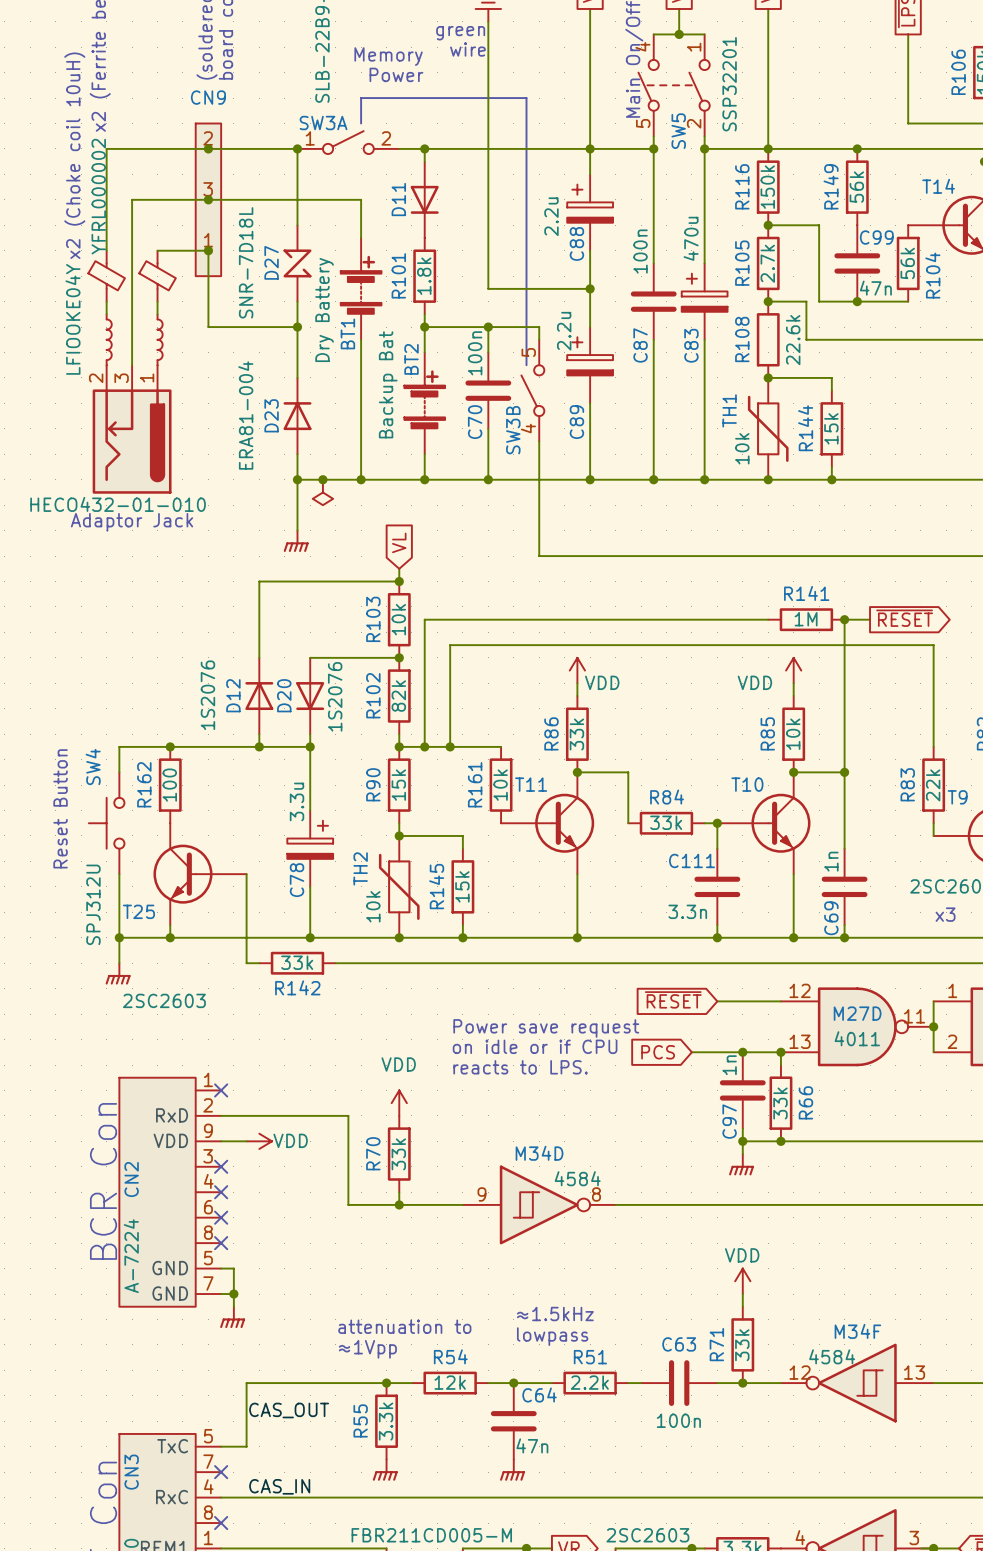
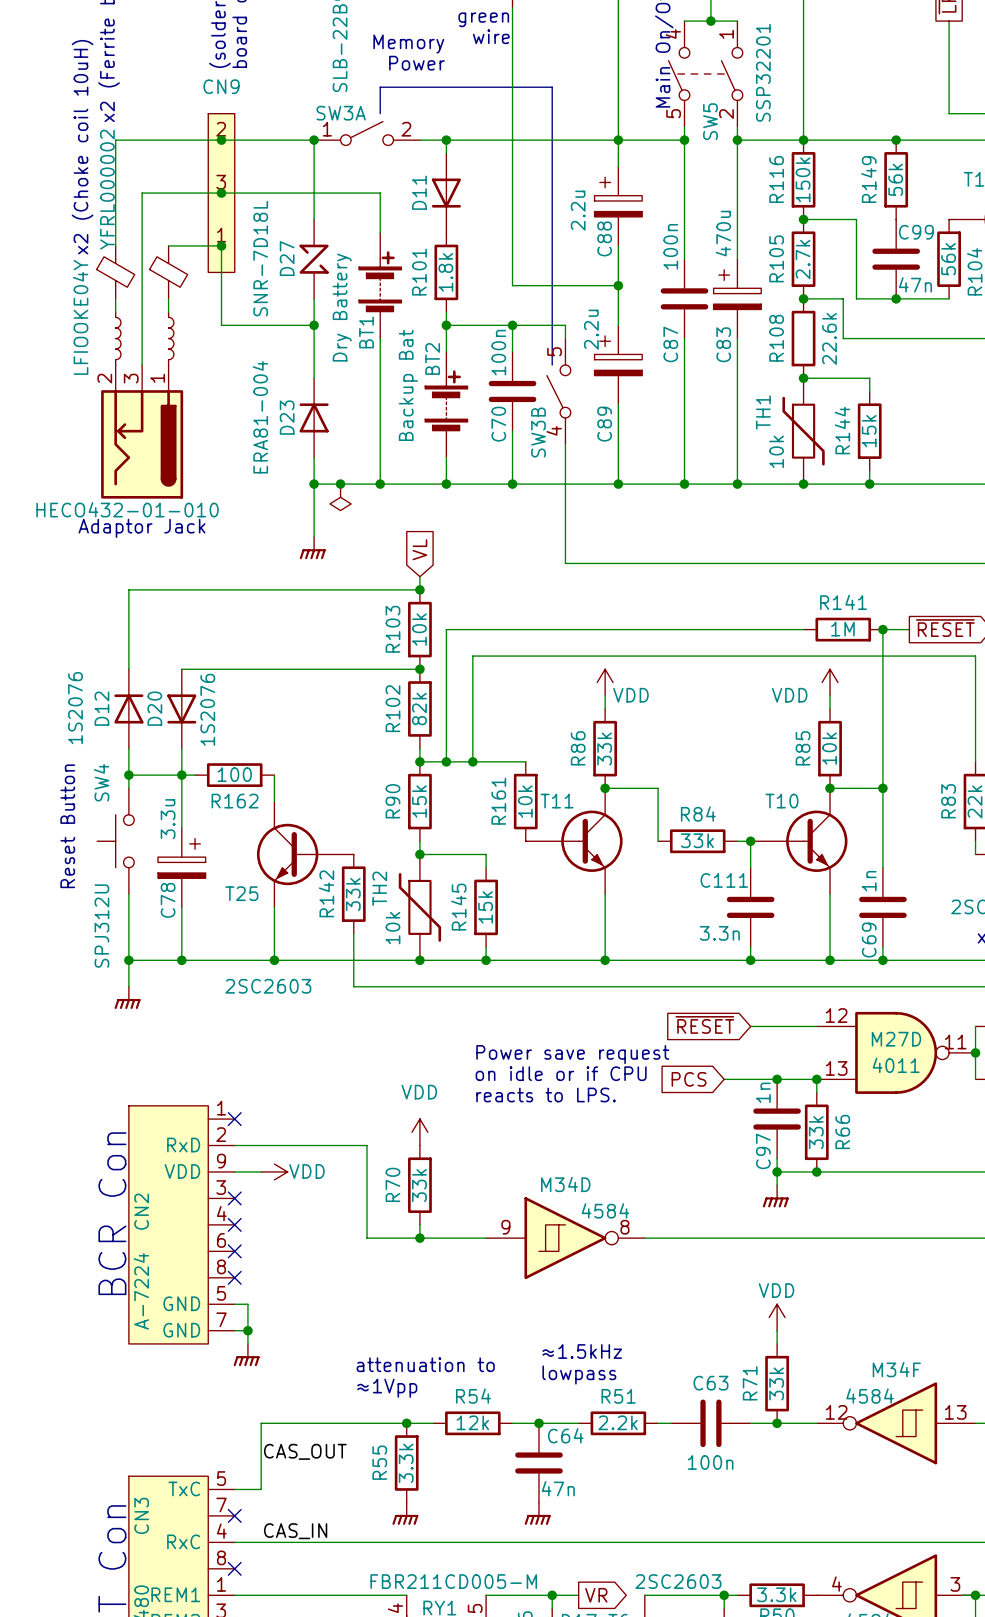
wire: (259, 581) (259, 657) -> (274, 589) (128, 589) (128, 669)
wire: none -> (181, 669) (327, 669)
D12 position: (259, 696) -> (128, 708)
D20 position: (310, 696) -> (181, 708)
wire: (259, 734) (259, 746) -> none
wire: (310, 734) (310, 810) -> (181, 748) (181, 828)
wire: (119, 746) (310, 746) -> (128, 761) (128, 748)
junction position: (170, 746) -> (181, 775)
junction: (259, 746) -> none
junction: (310, 746) -> none
wire: none -> (128, 775) (195, 775)
junction: none -> (128, 775)
wire: none -> (274, 775) (274, 801)
R162 name position: R162 (144, 784) -> R162 (235, 801)
R162 rotation: 0° (170, 785) -> 90° clockwise (234, 775)
R162 position: (170, 785) -> (234, 775)
C78 position: (310, 848) -> (181, 867)
T25 position: (200, 874) -> (305, 854)
wire: (246, 874) (246, 963) (259, 963) -> none
wire: none -> (274, 907) (274, 960)
wire: (310, 886) (310, 937) -> (353, 933) (353, 986)
junction position: (310, 937) -> (274, 960)
R142 rotation: 0° (297, 963) -> 90° clockwise (353, 894)
R142 position: (297, 963) -> (353, 894)

